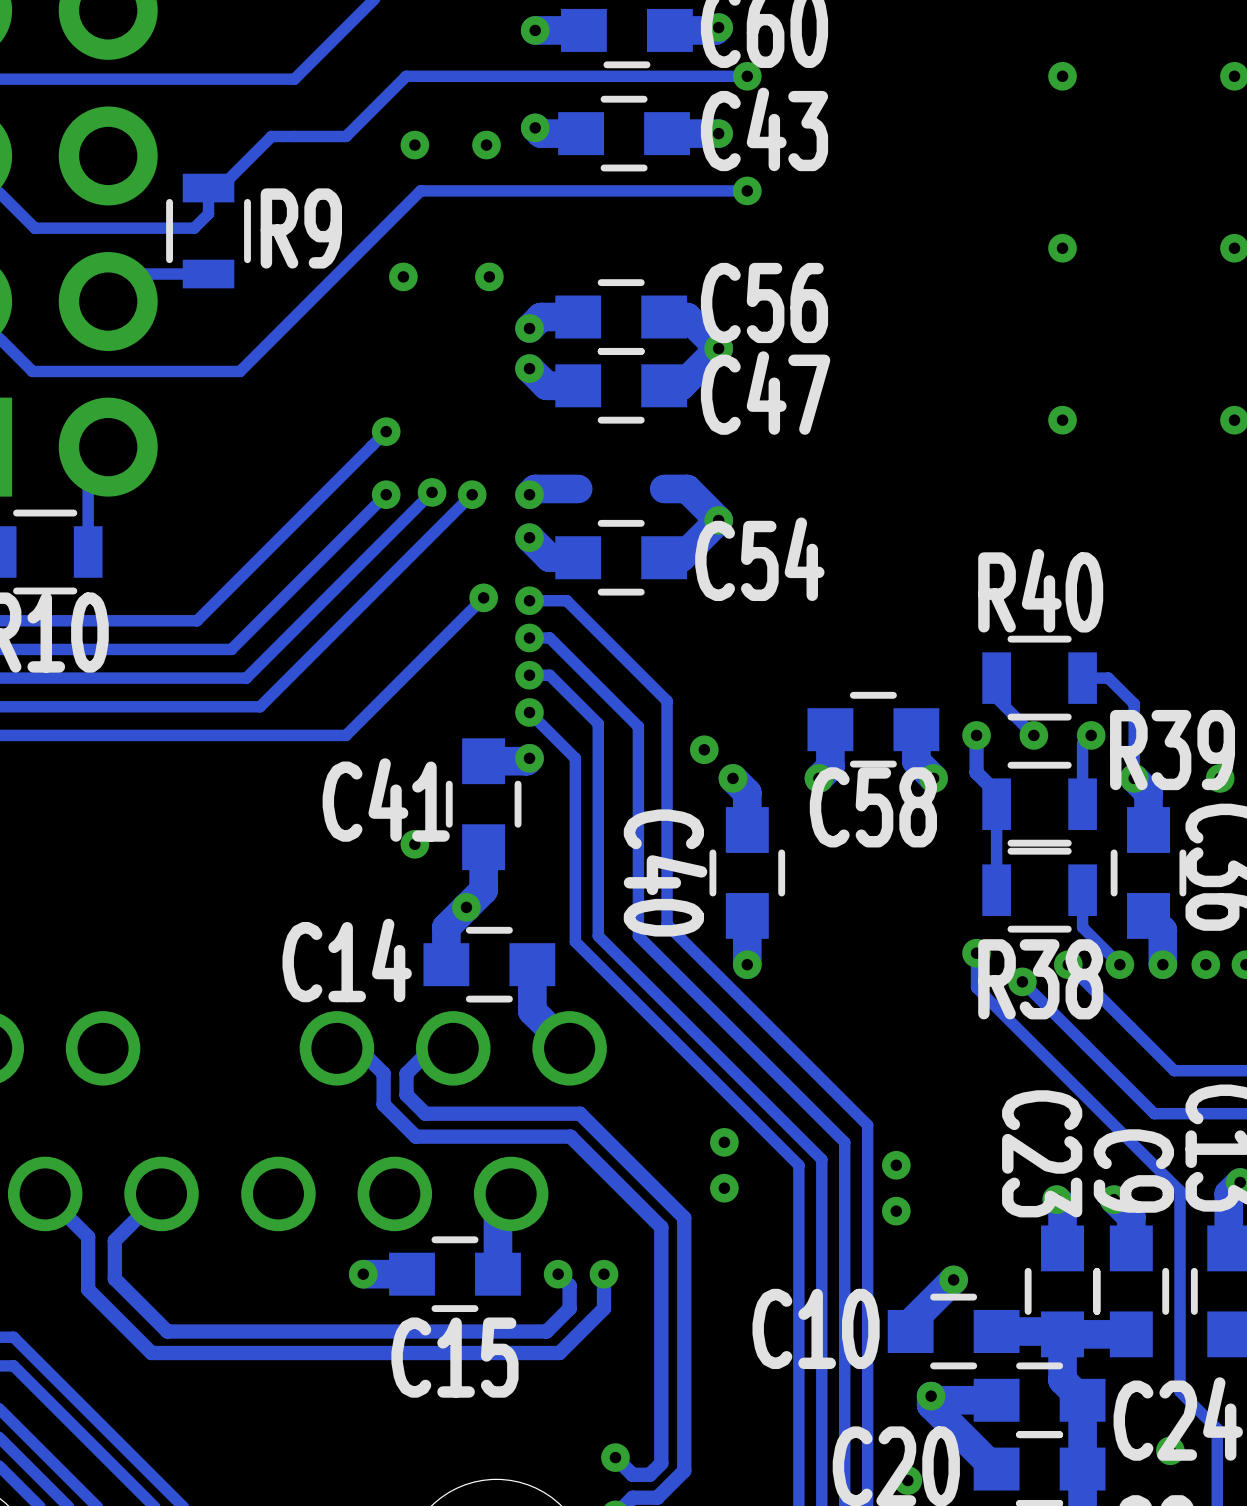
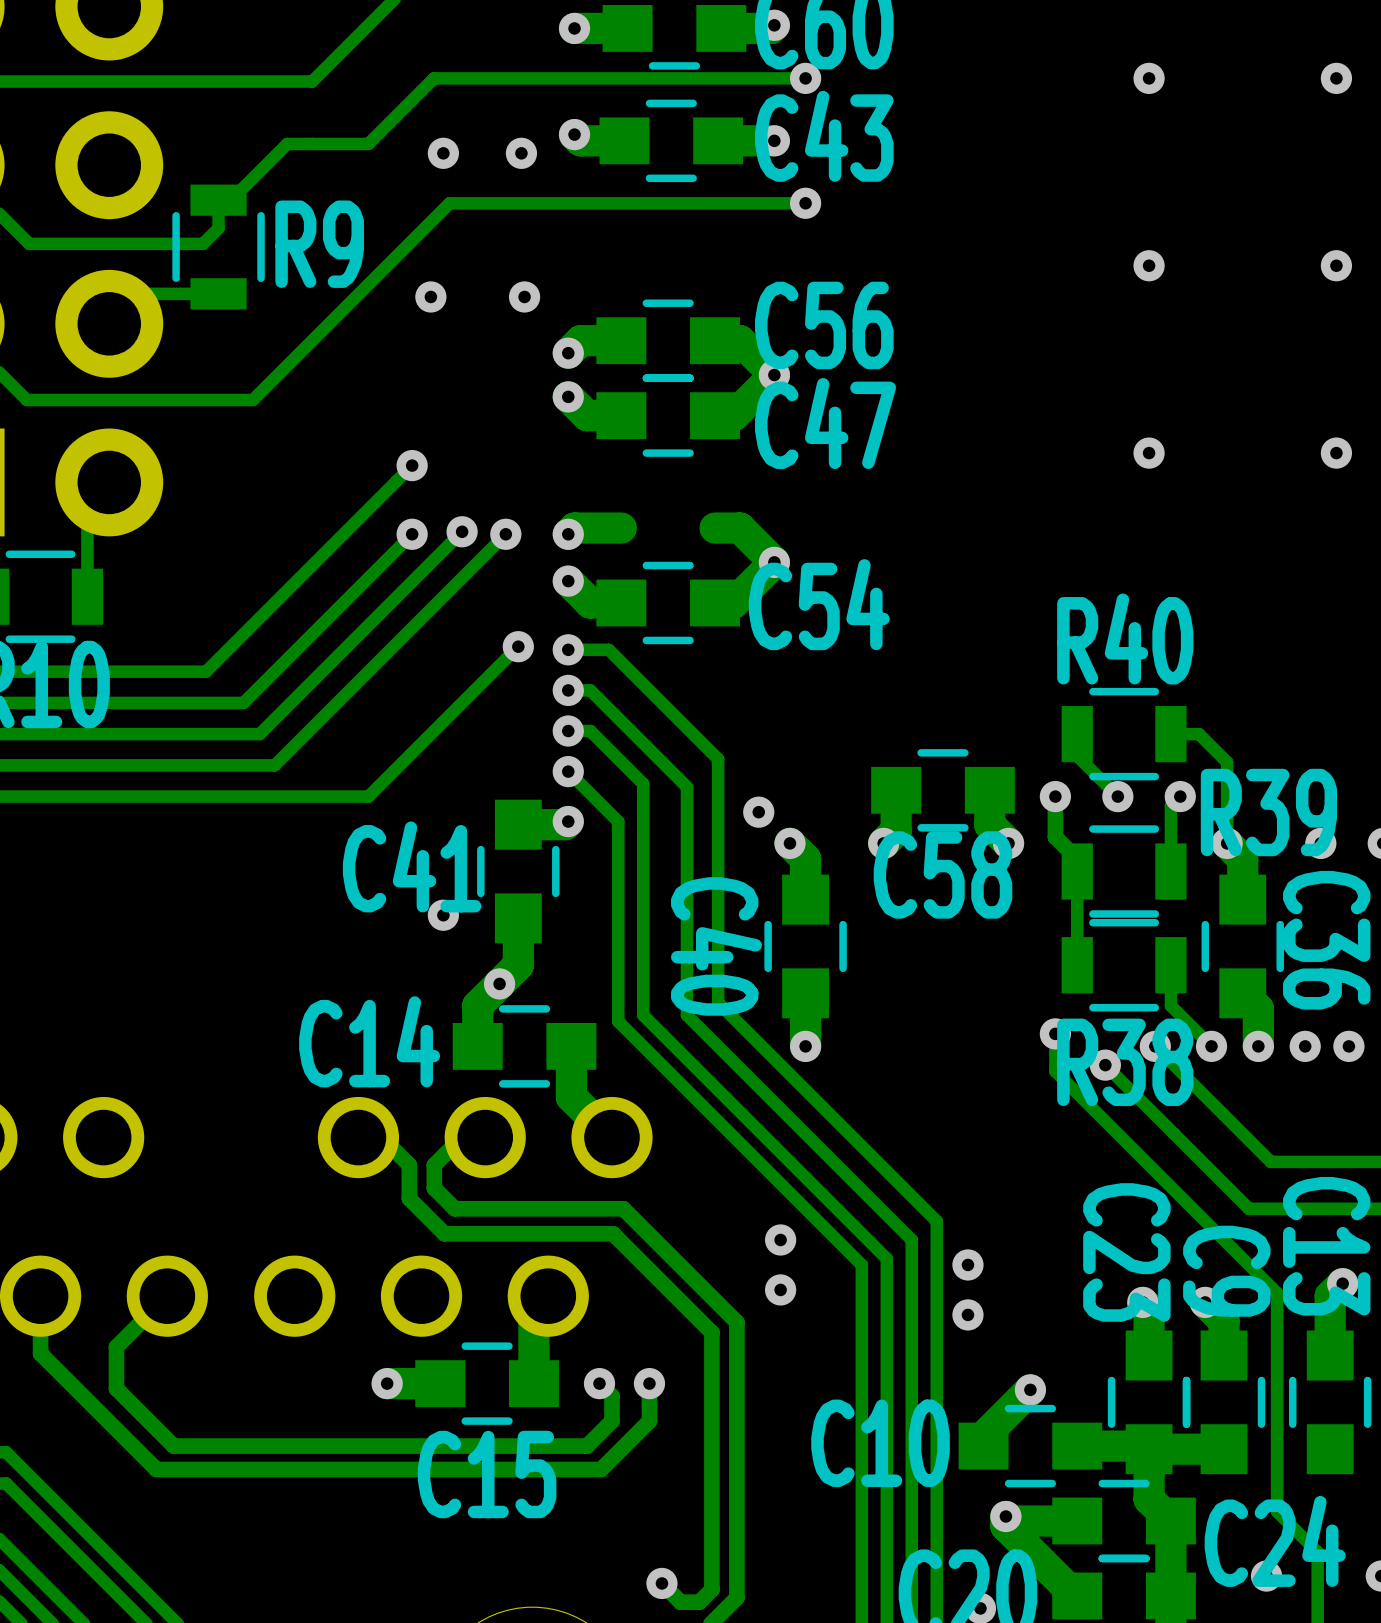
track: (45, 1193) (88, 1236) (88, 1289) -> (40, 1296) (40, 1353) (87, 1400)

